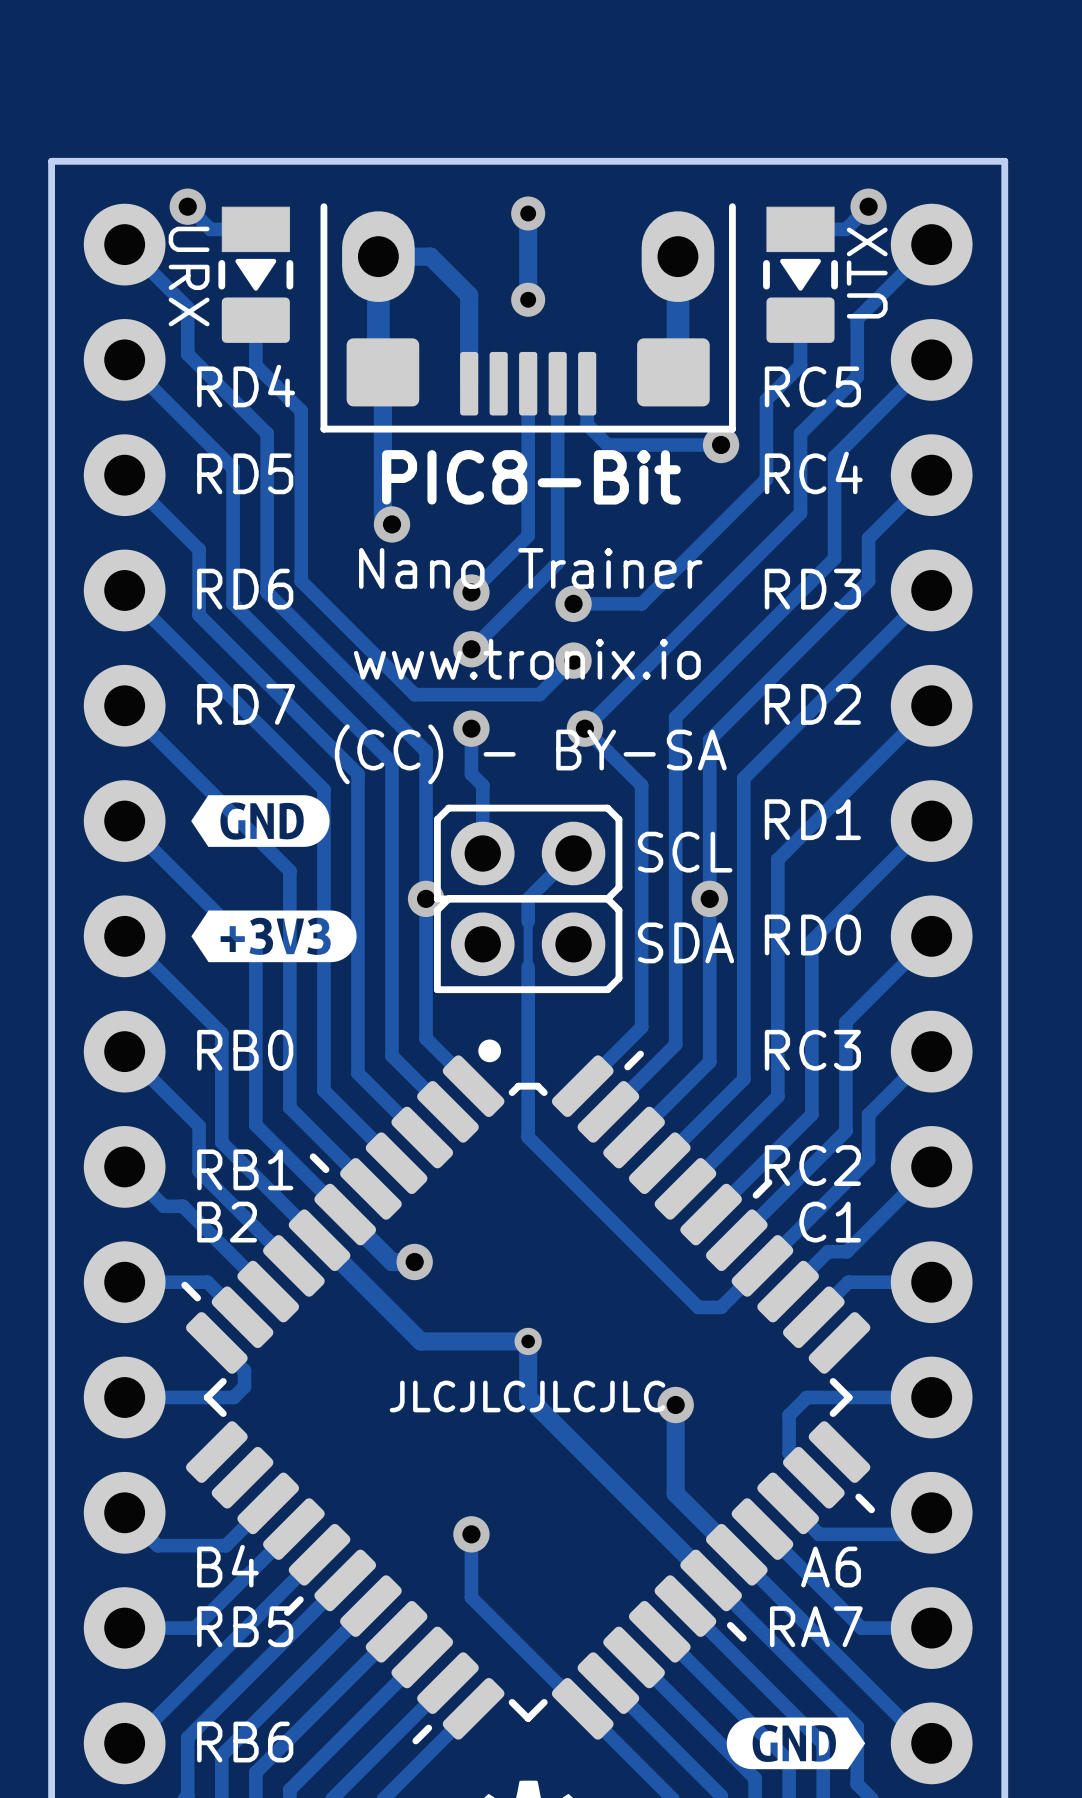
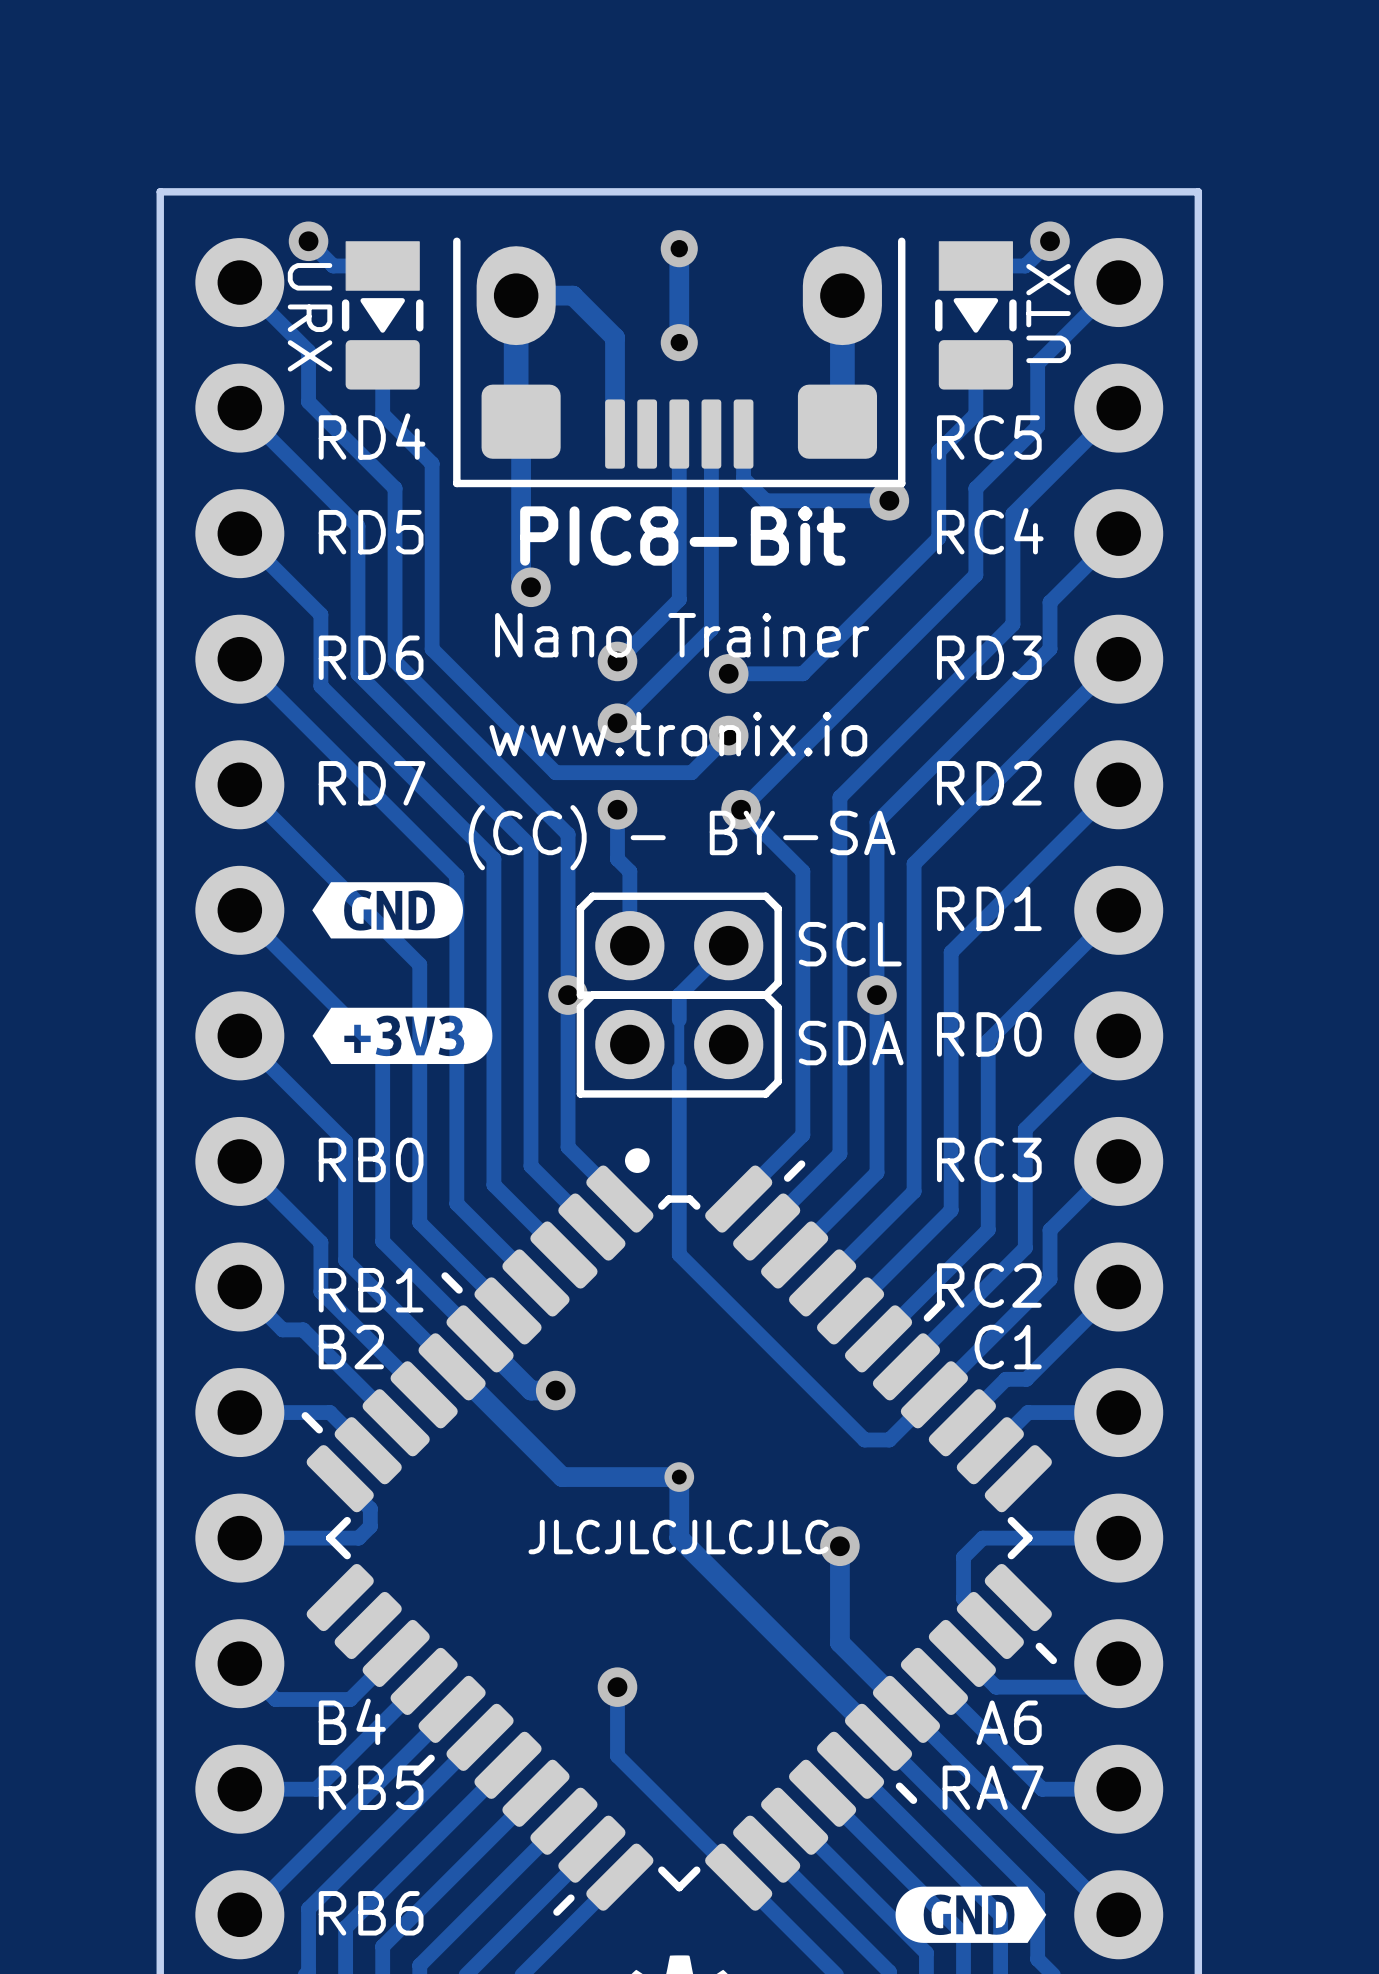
part footprint: [320, 203, 736, 433] -> [453, 237, 906, 488]

